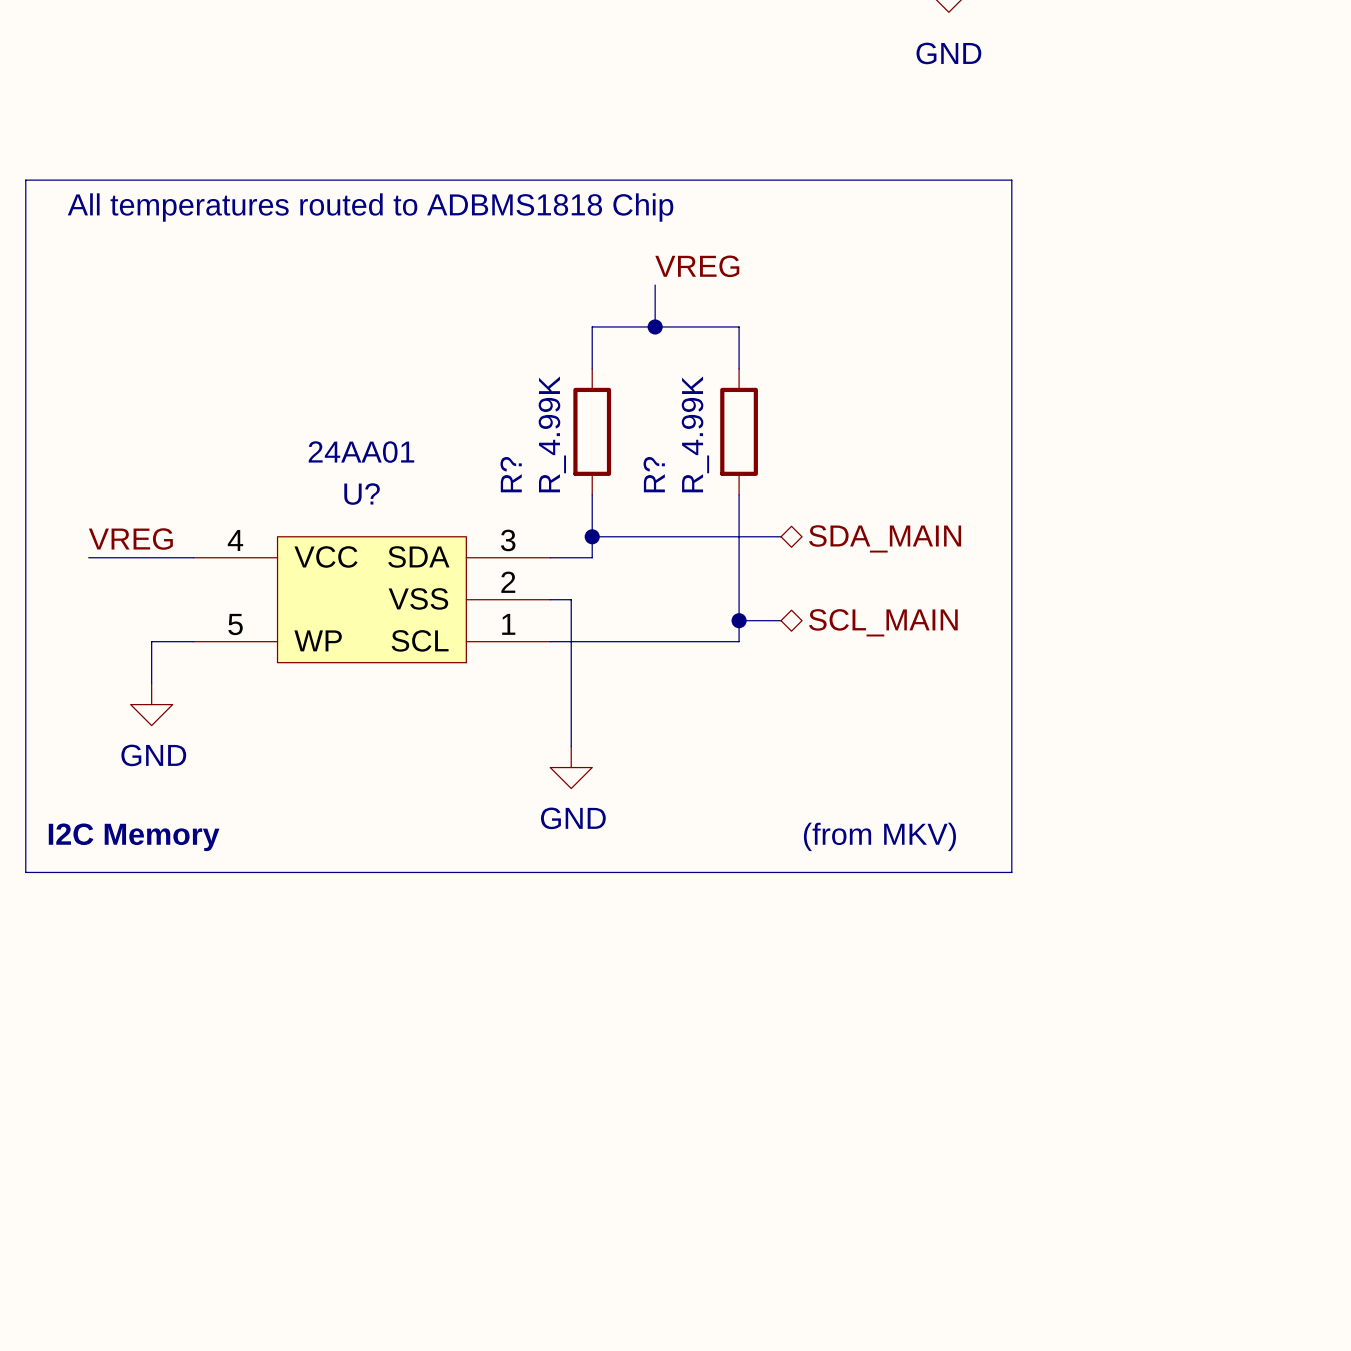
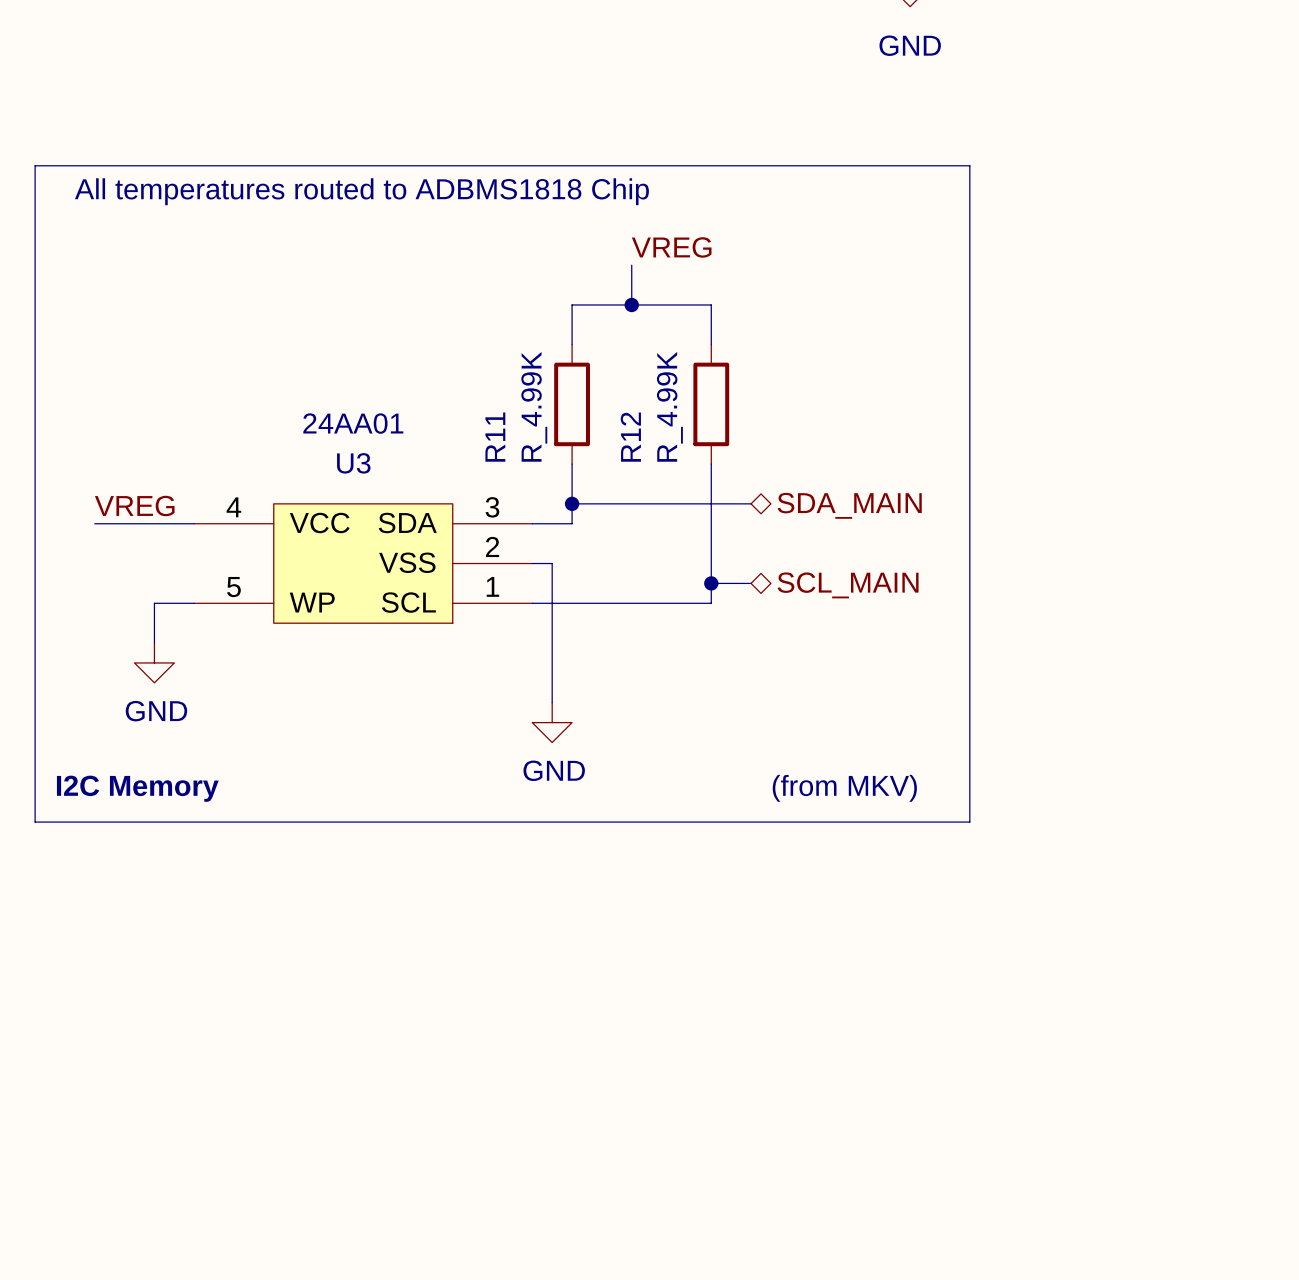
R? name: R? (511, 474) -> R11 (495, 437)
R? name: R? (654, 474) -> R12 (630, 437)
U? name: U? (362, 494) -> U3 (353, 463)

